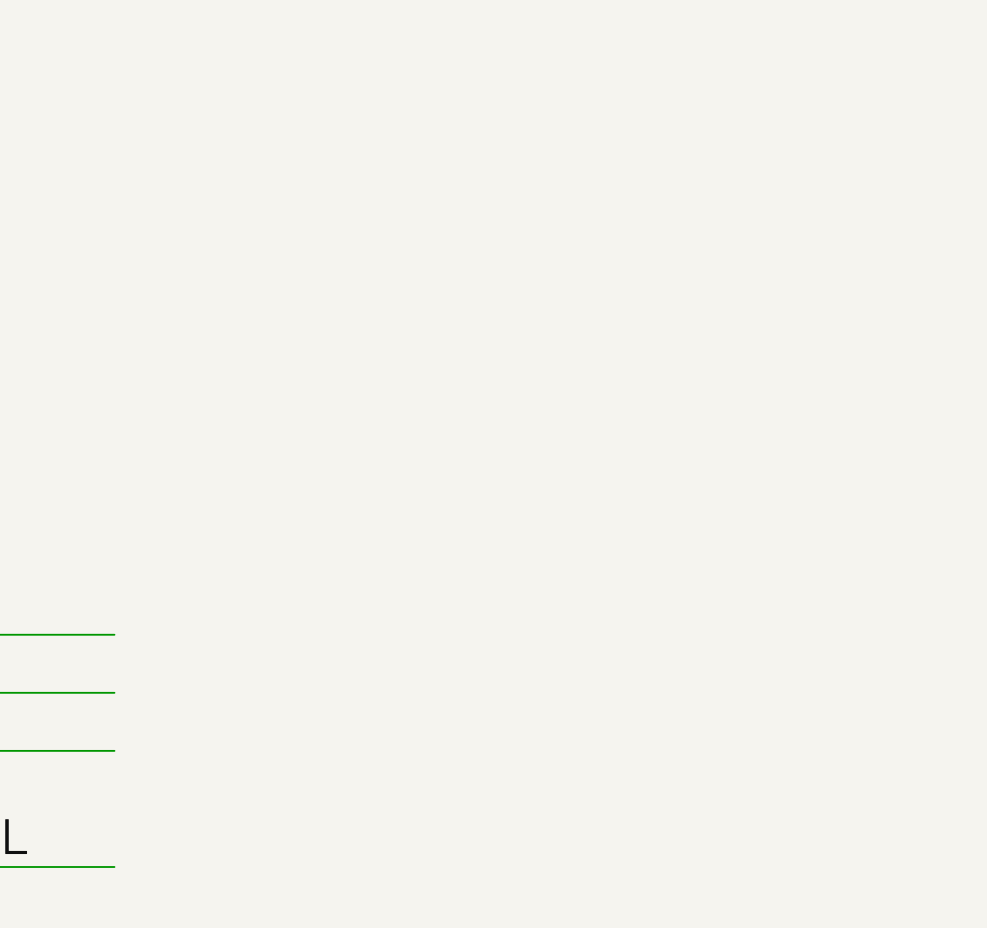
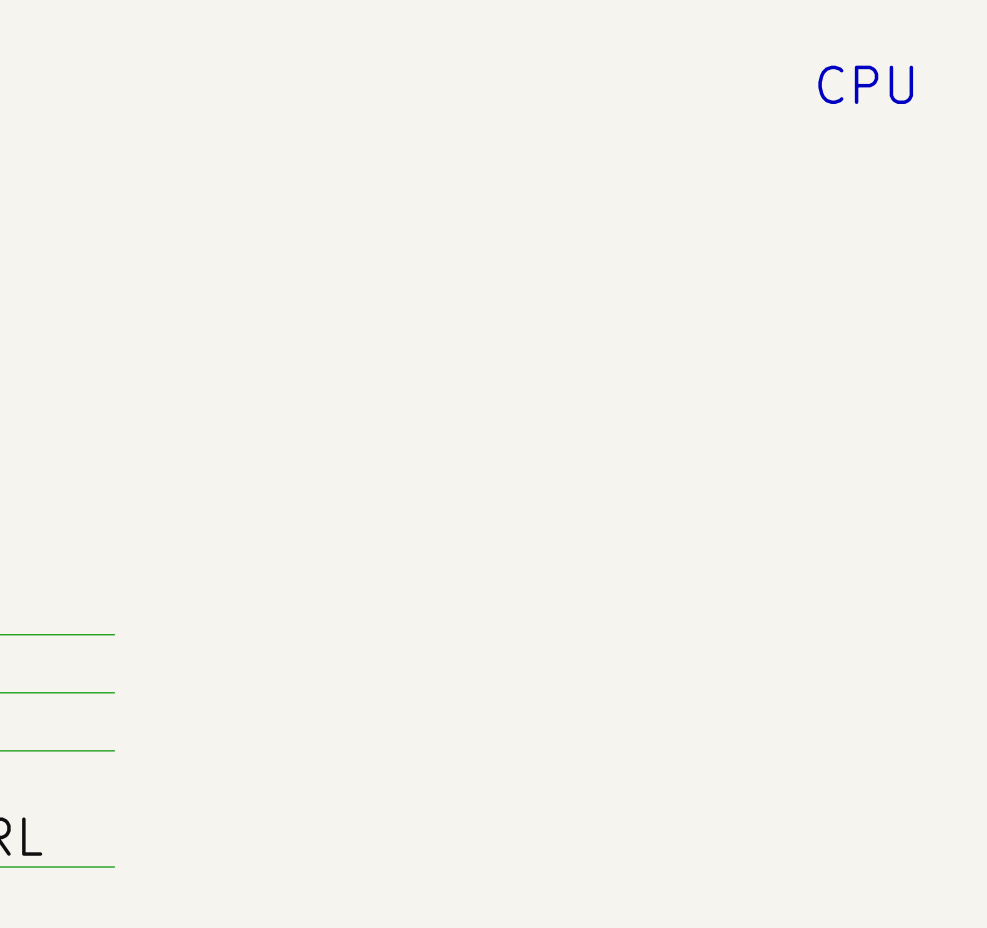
text: none -> CPU (865, 84)

